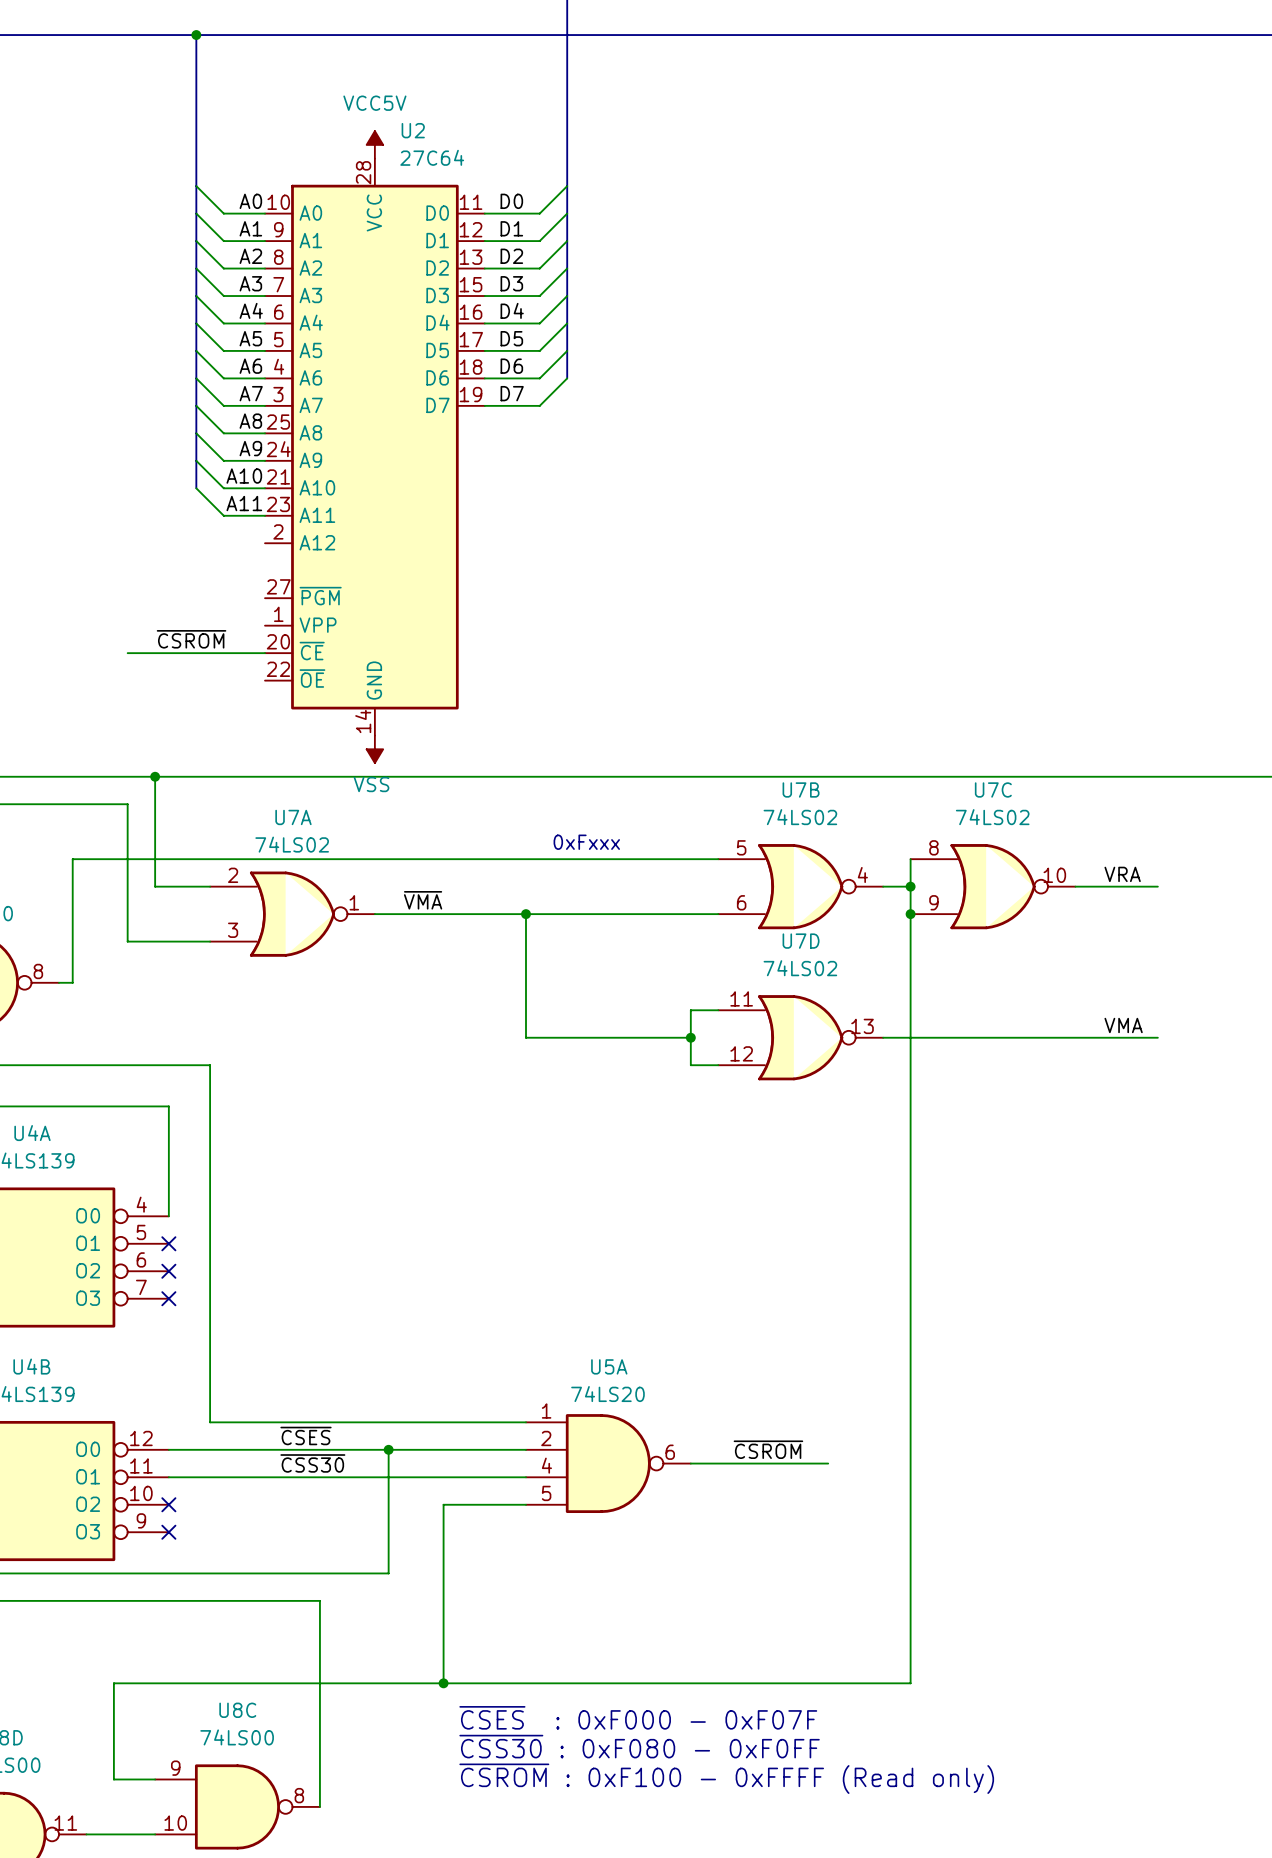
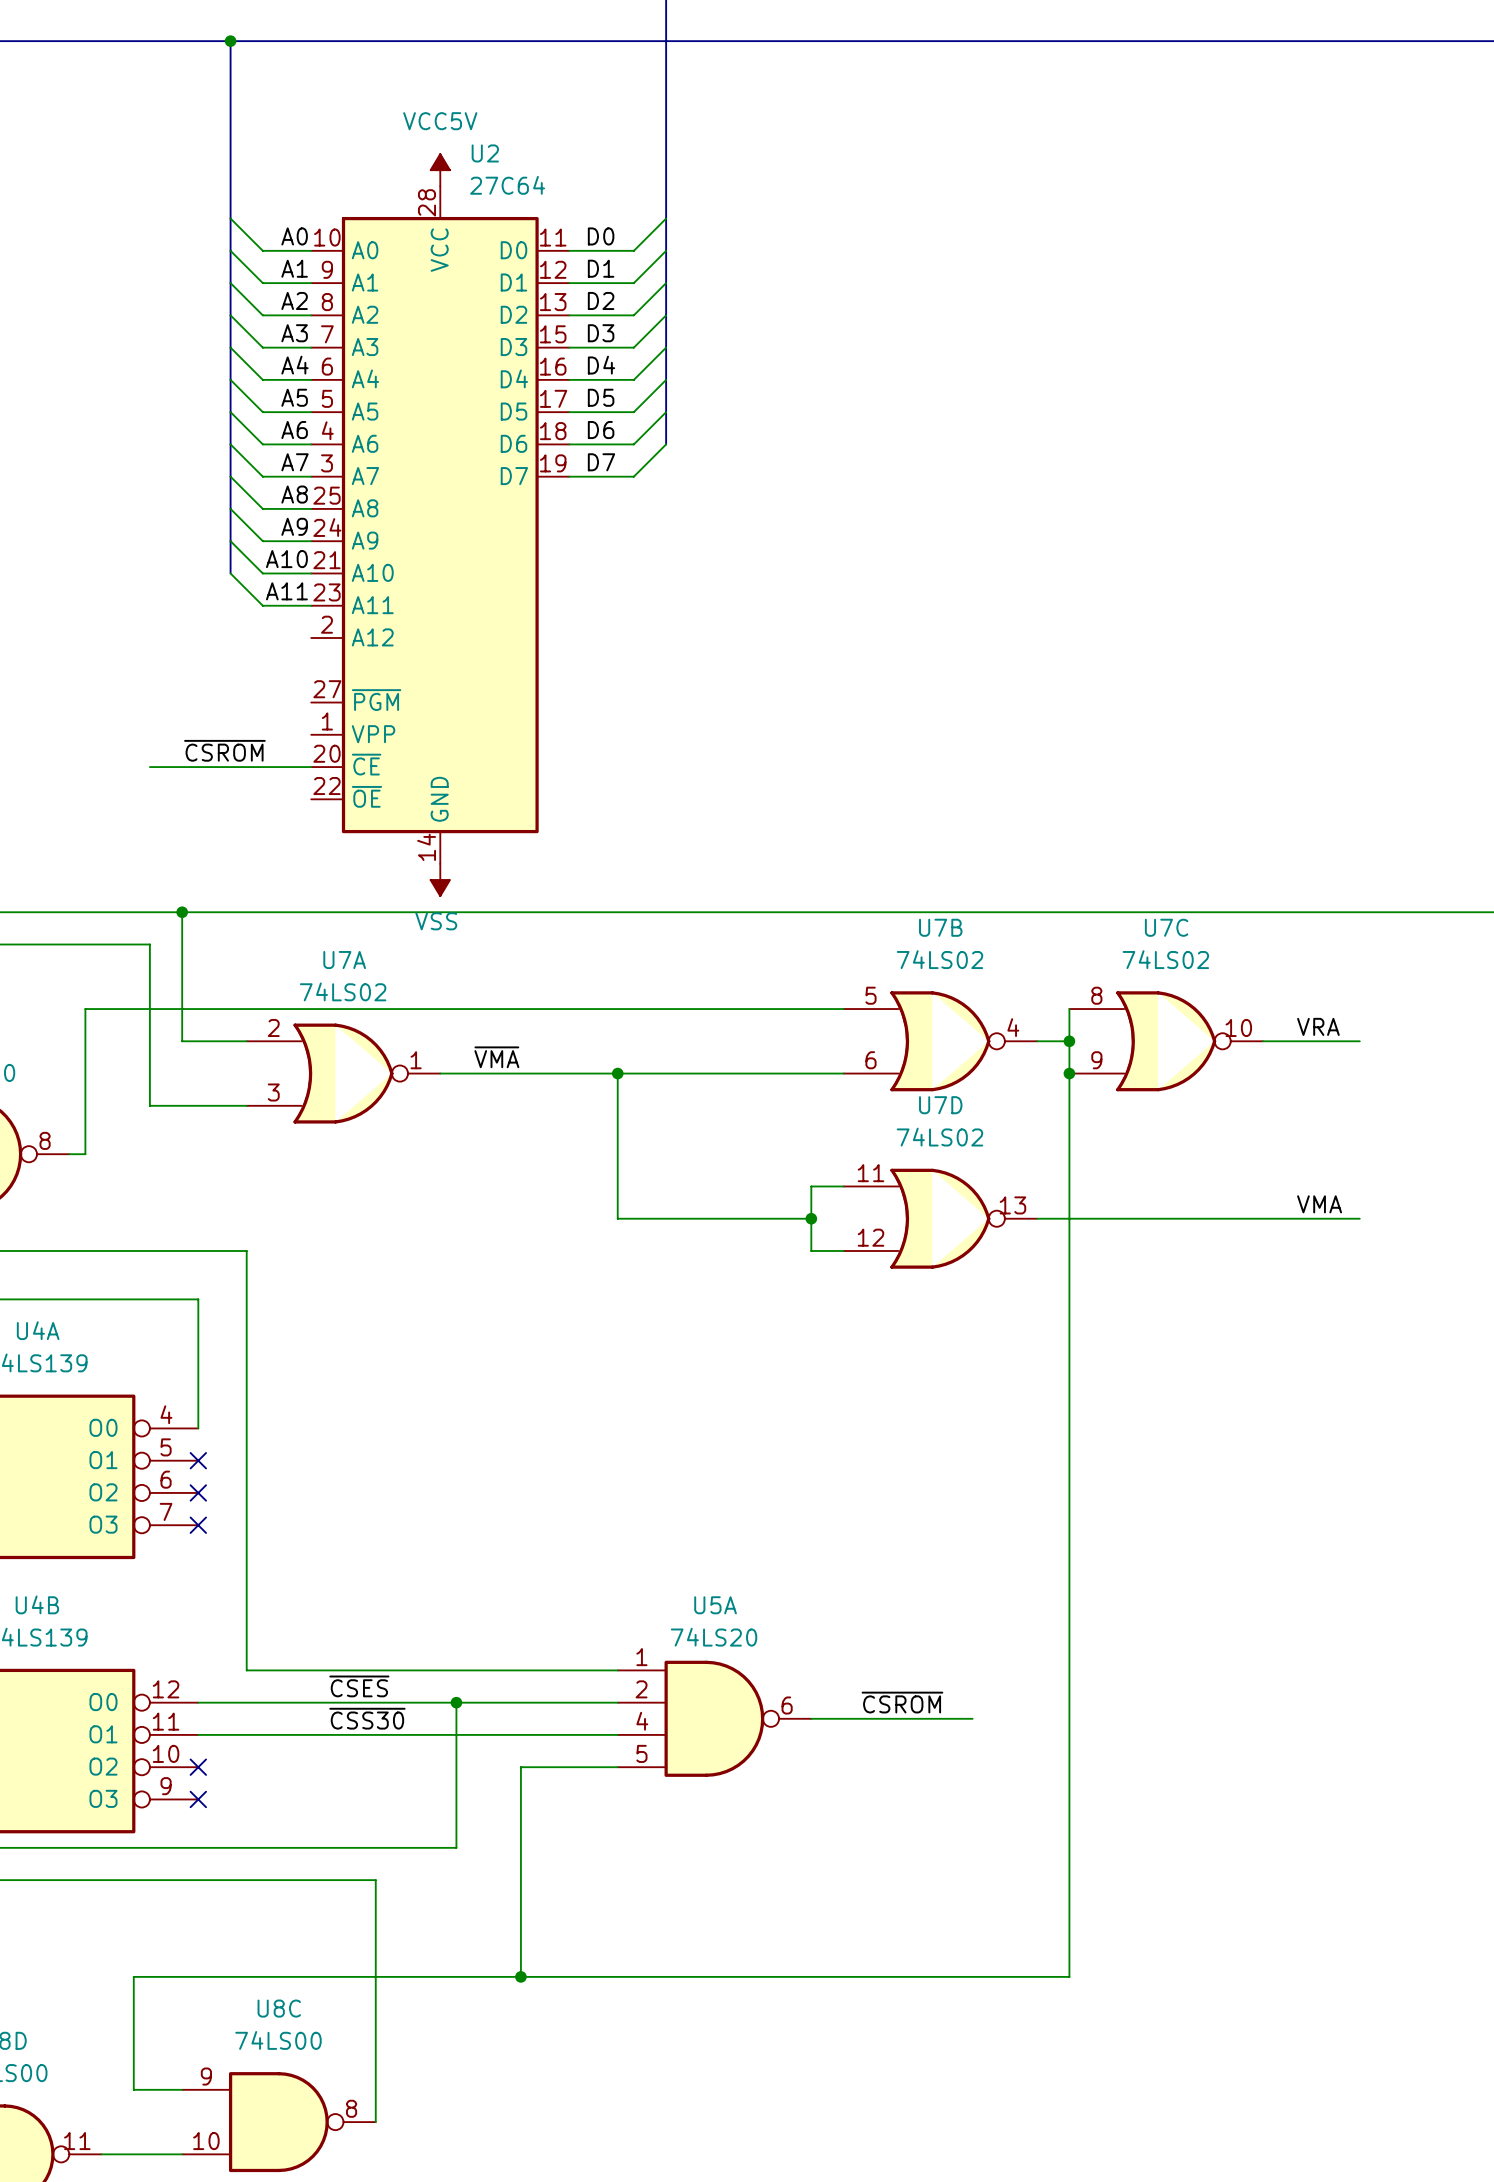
text: 0xFxxx (586, 842) -> none
text: ~{CSES} : 0xF000 - 0xF07F (638, 1717) -> none
text: ~{CSS30} : 0xF080 - 0xF0FF (639, 1746) -> none
text: ~{CSROM} : 0xF100 - 0xFFFF (Read only) (726, 1778) -> none

